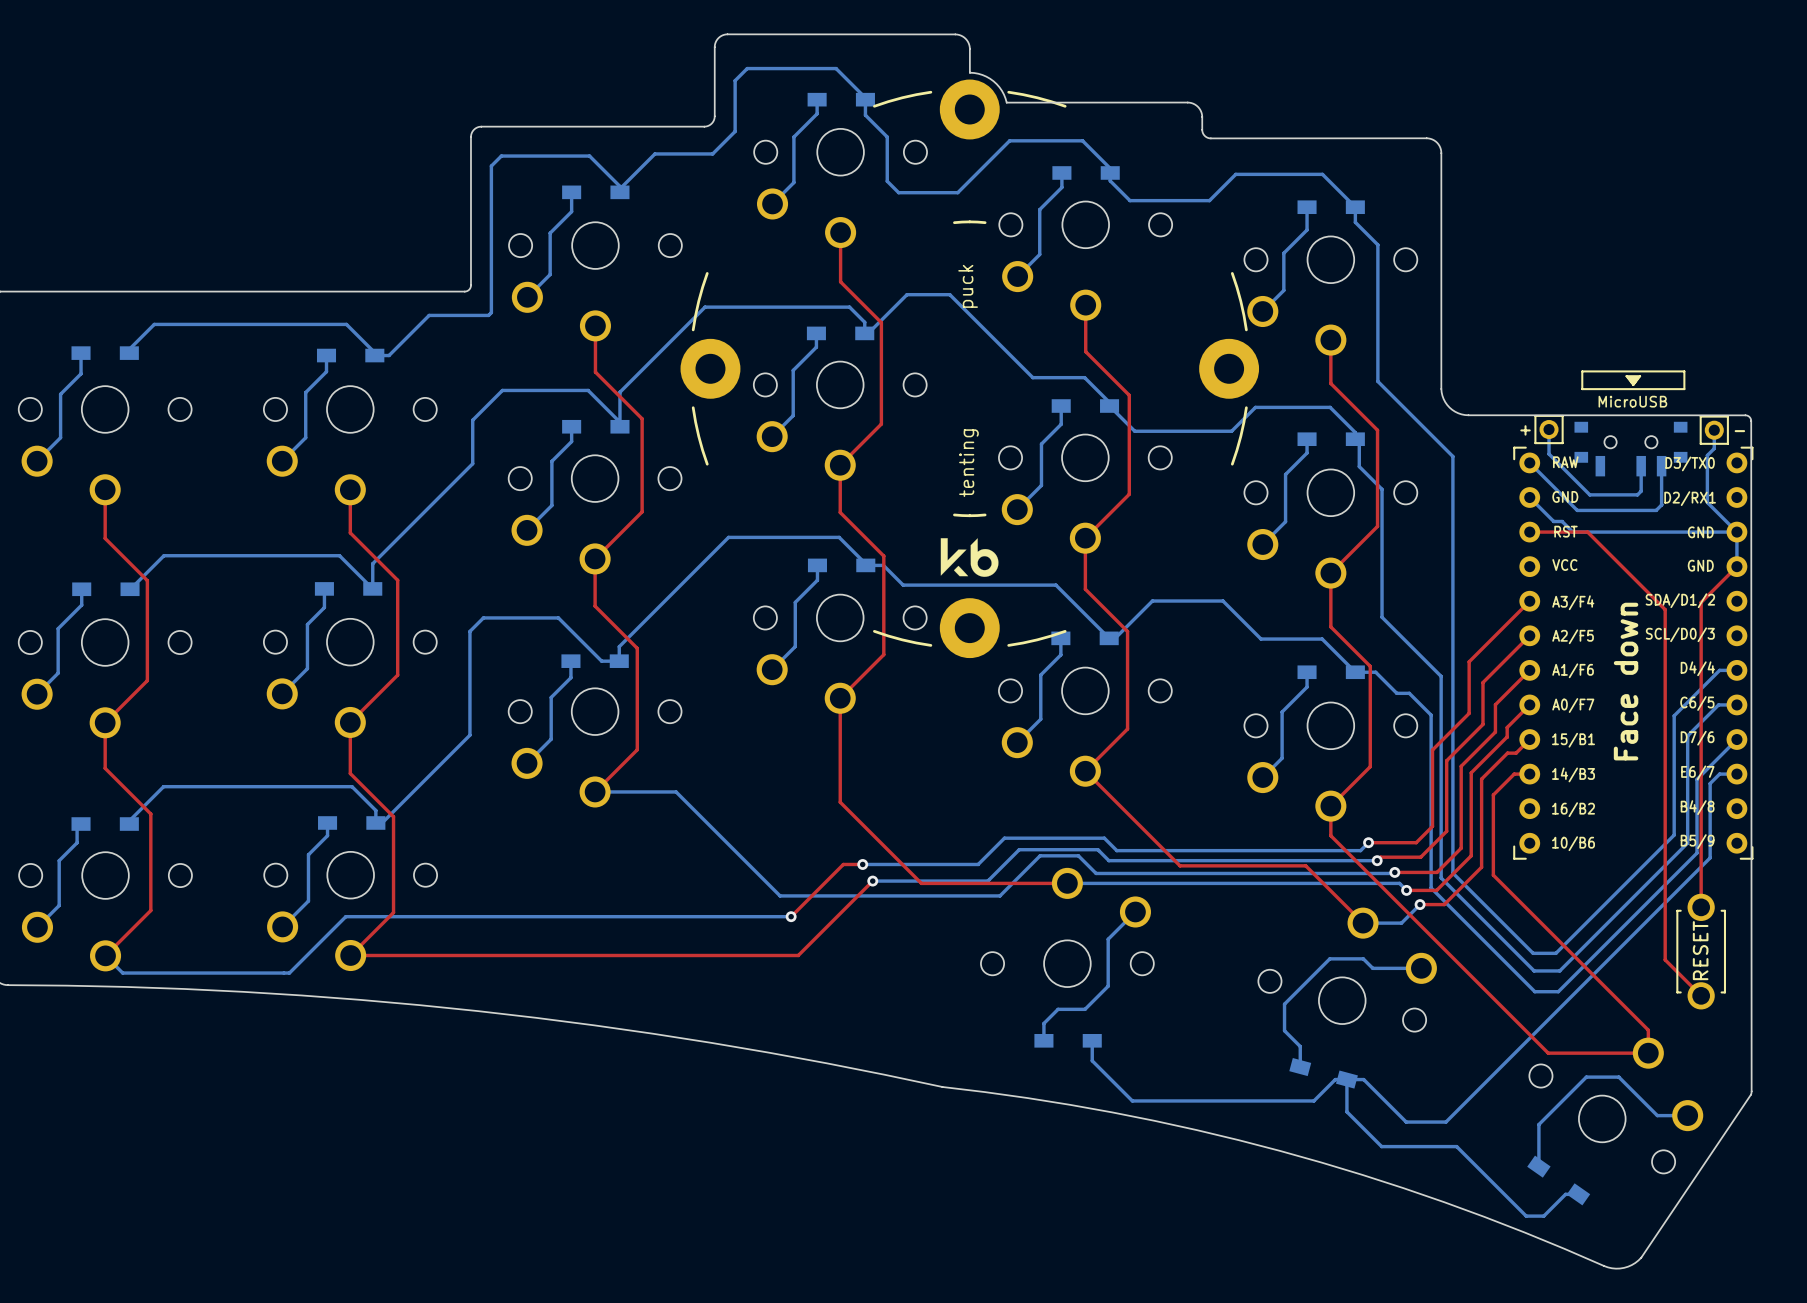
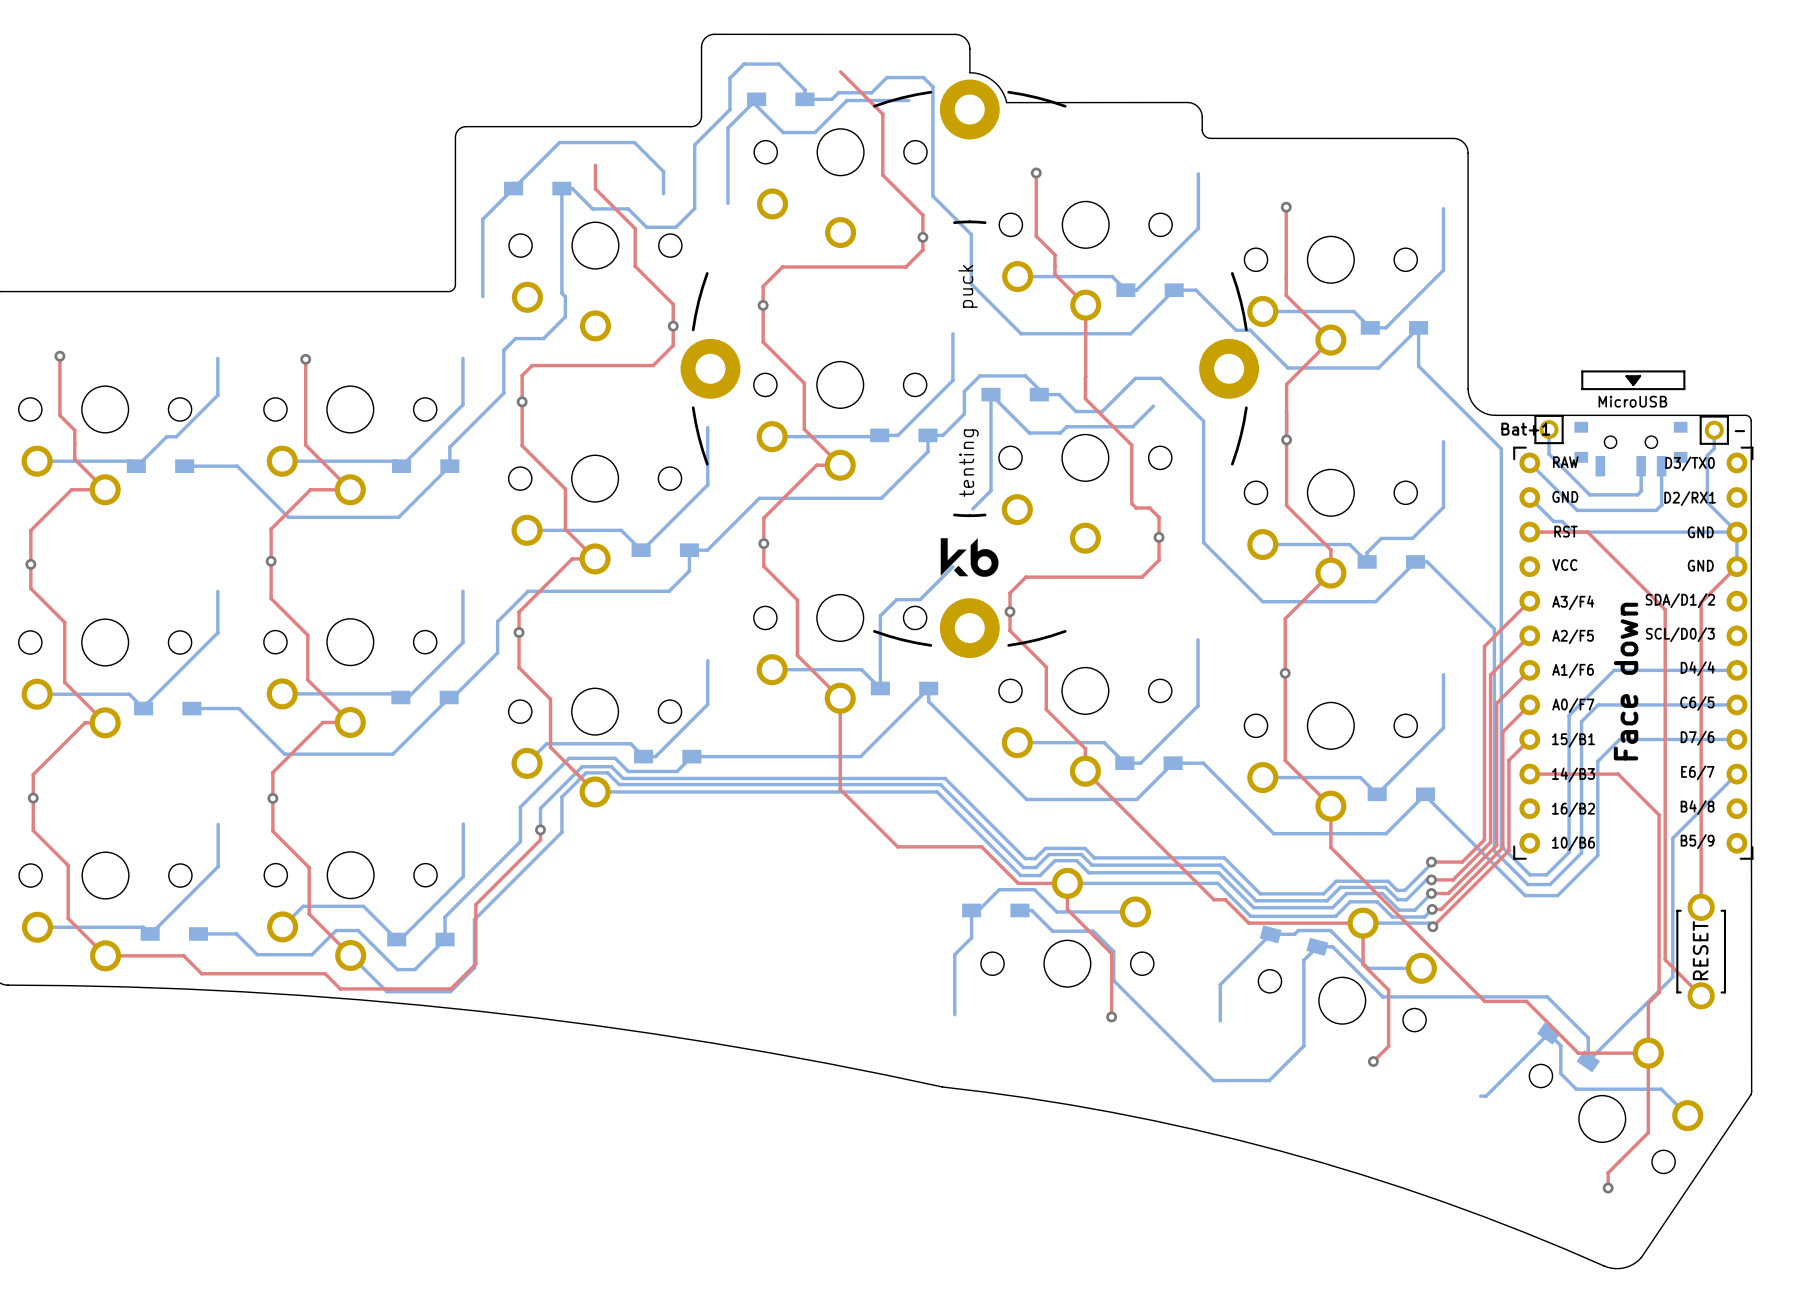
board edge: (727, 34) (719, 37) (714, 45) (713, 120) (707, 126) (691, 126) -> (727, 34) (711, 34) (702, 42) (701, 117) (697, 124) (691, 126)
bottom track: (817, 99) (817, 113) (793, 137) (793, 182) (772, 203) -> none
part position: (841, 99) -> (780, 99)
bottom track: none -> (908, 100) (847, 100) (815, 132) (783, 132) (756, 105) (756, 99) (727, 128) (727, 203)
board edge: (481, 126) (474, 129) (470, 137) (470, 286) (466, 291) (449, 291) -> (481, 126) (463, 127) (457, 130) (455, 136) (455, 285) (453, 289) (449, 291)
board edge: (1210, 138) (1426, 138) (1437, 142) (1441, 153) (1441, 388) (1445, 402) (1455, 411) (1468, 415) (1745, 415) -> (1210, 138) (1453, 138) (1463, 142) (1468, 153) (1468, 389) (1472, 402) (1482, 411) (1495, 415) (1745, 415)
top track: none -> (1036, 172) (1036, 236) (1054, 254) (1054, 274) (1085, 305)
via: none -> (1036, 172)
bottom track: (1061, 172) (1061, 187) (1039, 209) (1039, 254) (1017, 276) -> (1198, 173) (1198, 228) (1136, 290) (1125, 290) (1112, 276) (1017, 276)
part: (1086, 172) -> none
bottom track: (619, 188) (654, 153) (712, 153) (735, 131) (735, 80) (747, 68) (836, 68) (865, 97) (865, 115) (887, 137) (887, 181) (898, 192) (957, 192) (1009, 140) (1082, 140) (1110, 168) (1110, 180) (1129, 200) (1209, 200) (1235, 174) (1322, 174) (1355, 207) (1355, 222) (1377, 244) (1377, 381) (1452, 456) (1452, 873) (1533, 953) (1555, 953) (1674, 835) (1674, 715) (1719, 670) -> (184, 466) (237, 466) (288, 517) (398, 517) (449, 466) (449, 447) (503, 393) (503, 350) (515, 338) (543, 338) (565, 316) (565, 296) (561, 293) (561, 188) (572, 188) (592, 208) (628, 208) (646, 227) (676, 227) (694, 208) (694, 144) (729, 109) (729, 78) (744, 64) (779, 64) (804, 89) (804, 99) (831, 99) (838, 92) (871, 92) (886, 77) (923, 77) (932, 86) (932, 196) (971, 234) (971, 283) (1021, 333) (1130, 333) (1174, 290) (1196, 290) (1236, 330) (1250, 330) (1287, 367) (1378, 367) (1418, 327) (1418, 366) (1501, 448) (1501, 846) (1530, 874) (1546, 874) (1569, 852) (1569, 715) (1614, 670) (1719, 670)
bottom track: (571, 192) (571, 211) (550, 233) (550, 274) (527, 297) -> none
part position: (595, 192) -> (537, 188)
bottom track: (619, 192) (619, 186) (589, 156) (501, 156) (491, 166) (491, 312) (488, 315) (429, 315) (389, 355) (374, 355) (374, 352) (346, 324) (154, 324) (129, 349) (129, 353) -> none
bottom track: none -> (663, 193) (663, 171) (634, 142) (559, 142) (482, 219) (482, 296)
via: none -> (1286, 207)
bottom track: (1307, 207) (1307, 229) (1283, 253) (1283, 290) (1262, 311) -> (1443, 208) (1443, 270) (1385, 327) (1370, 327) (1353, 311) (1262, 311)
part: (1331, 207) -> none
top track: (840, 232) (840, 281) (881, 322) (881, 424) (840, 465) (840, 512) (883, 556) (883, 654) (840, 698) -> (840, 71) (882, 114) (882, 175) (922, 215) (922, 250) (905, 267) (782, 267) (763, 286) (763, 342) (804, 383) (804, 429) (840, 465) (816, 465) (763, 518) (763, 566) (797, 599) (797, 655) (840, 698)
via: none -> (922, 237)
part: none -> (1149, 290)
via: none -> (763, 305)
top track: (595, 325) (595, 372) (642, 418) (642, 511) (595, 558) (595, 606) (637, 648) (637, 749) (595, 791) -> (595, 165) (595, 188) (635, 228) (635, 266) (673, 304) (673, 345) (653, 365) (532, 365) (522, 375) (522, 445) (565, 488) (565, 529) (595, 558) (572, 558) (519, 612) (519, 667) (550, 699) (550, 747) (595, 791)
via: none -> (673, 326)
part: none -> (1394, 327)
bottom track: (816, 333) (816, 347) (793, 370) (793, 415) (772, 436) -> (952, 333) (952, 380) (897, 435) (772, 436)
part: (840, 333) -> none
top track: (1330, 340) (1330, 383) (1377, 430) (1377, 526) (1330, 573) (1330, 626) (1370, 666) (1370, 766) (1330, 806) -> (1286, 207) (1286, 295) (1330, 340) (1286, 384) (1286, 505) (1330, 549) (1330, 573) (1285, 618) (1285, 760) (1330, 806)
top track: (1085, 351) (1129, 395) (1129, 494) (1085, 538) (1085, 589) (1127, 631) (1127, 729) (1085, 771) -> (1085, 351) (1085, 398) (1131, 445) (1131, 503) (1136, 508) (1149, 508) (1159, 517) (1159, 560) (1142, 577) (1025, 577) (1010, 593) (1010, 630) (1046, 667) (1046, 709) (1085, 748) (1085, 771)
bottom track: (81, 353) (81, 373) (60, 394) (60, 437) (37, 461) -> (217, 358) (217, 395) (176, 436) (166, 436) (137, 466) (131, 461) (37, 461)
part: (105, 353) -> none
bottom track: (326, 355) (326, 371) (305, 392) (305, 437) (282, 461) -> (462, 358) (462, 404) (401, 466) (396, 461) (282, 461)
part: (350, 355) -> none
top track: none -> (59, 356) (59, 415) (74, 430) (74, 459) (105, 489) (71, 489) (30, 530) (30, 588) (64, 622) (64, 682) (105, 722) (85, 722) (33, 774) (33, 830) (68, 865) (68, 918) (105, 955) (183, 955) (201, 973) (325, 973) (340, 988) (450, 988) (475, 964) (475, 904) (540, 839) (540, 829)
via: none -> (59, 356)
top track: none -> (305, 359) (305, 445) (350, 489) (310, 489) (271, 529) (271, 598) (307, 635) (307, 679) (350, 722) (322, 722) (272, 772) (272, 831) (309, 867) (309, 914) (350, 955)
via: none -> (305, 359)
part: none -> (1015, 394)
via: none -> (522, 401)
bottom track: (1061, 406) (1061, 424) (1041, 444) (1041, 485) (1017, 509) -> none
part: (1085, 406) -> none
bottom track: none -> (1153, 406) (1132, 426) (1066, 426) (1060, 432) (1029, 432) (990, 394) (990, 490) (972, 508)
bottom track: (619, 422) (588, 390) (502, 390) (472, 420) (472, 463) (372, 563) (372, 588) (339, 555) (163, 555) (130, 589) -> none
bottom track: (571, 426) (571, 441) (551, 461) (551, 505) (527, 530) -> (707, 427) (707, 484) (642, 550) (621, 530) (527, 530)
part: (595, 426) -> none
bottom track: (619, 426) (619, 392) (705, 307) (849, 307) (864, 322) (864, 333) (868, 333) (906, 294) (949, 294) (1032, 377) (1084, 377) (1134, 431) (1231, 431) (1255, 407) (1330, 407) (1355, 432) (1355, 439) (1359, 443) (1359, 466) (1382, 489) (1382, 617) (1441, 676) (1441, 877) (1534, 970) (1559, 970) (1687, 843) (1687, 735) (1718, 704) -> (191, 708) (238, 708) (284, 754) (392, 754) (449, 697) (453, 697) (497, 652) (497, 621) (528, 591) (669, 591) (689, 571) (689, 550) (707, 550) (759, 498) (881, 498) (927, 451) (927, 435) (942, 435) (964, 413) (964, 391) (979, 375) (1025, 375) (1039, 389) (1039, 394) (1059, 394) (1076, 411) (1102, 411) (1135, 378) (1160, 378) (1203, 421) (1203, 542) (1262, 601) (1375, 601) (1415, 561) (1427, 561) (1494, 629) (1494, 850) (1527, 884) (1550, 884) (1581, 853) (1581, 721) (1598, 704) (1718, 704)
Bat+1 name: + (1525, 430) -> Bat+1 (1525, 429)
part: none -> (903, 435)
via: none -> (1286, 439)
bottom track: (1307, 439) (1307, 452) (1285, 474) (1285, 521) (1262, 544) -> (1443, 441) (1443, 507) (1412, 538) (1381, 538) (1367, 552) (1367, 561) (1349, 544) (1262, 544)
part: (1331, 439) -> none
part: none -> (160, 466)
part: none -> (425, 466)
top track: (105, 489) (105, 538) (147, 580) (147, 680) (105, 722) (105, 768) (150, 813) (150, 910) (105, 955) -> none
top track: (350, 489) (350, 532) (397, 580) (397, 675) (350, 722) (350, 773) (393, 816) (393, 912) (350, 955) (798, 955) (872, 881) -> none
via: none -> (1159, 537)
via: none -> (763, 543)
part: none -> (665, 550)
via: none -> (271, 561)
part: none -> (1391, 561)
via: none -> (30, 564)
bottom track: (817, 565) (817, 580) (795, 602) (795, 646) (772, 669) -> (952, 566) (920, 599) (896, 599) (880, 615) (880, 688) (861, 669) (772, 669)
part: (841, 565) -> none
bottom track: (324, 588) (324, 607) (307, 624) (307, 668) (282, 693) -> (462, 591) (462, 642) (408, 697) (400, 697) (397, 693) (282, 693)
part: (348, 588) -> none
bottom track: (81, 589) (81, 605) (58, 628) (58, 673) (37, 694) -> (217, 591) (217, 632) (143, 708) (129, 694) (37, 694)
part: (105, 589) -> none
via: none -> (1010, 611)
via: none -> (519, 632)
bottom track: (1060, 638) (1060, 654) (1040, 675) (1040, 719) (1017, 742) -> (1198, 639) (1198, 705) (1140, 763) (1124, 763) (1104, 742) (1017, 742)
part: (1085, 638) -> none
top track: (1484, 646) (1469, 661) (1469, 713) (1432, 750) (1432, 826) (1416, 842) (1368, 842) -> (1484, 646) (1484, 839) (1462, 862) (1431, 862)
bottom track: (570, 661) (570, 677) (551, 697) (551, 739) (546, 743) -> (707, 660) (707, 704) (655, 756) (643, 756) (630, 743) (546, 743)
part: (595, 661) -> none
bottom track: (1307, 672) (1307, 687) (1282, 712) (1282, 758) (1262, 777) -> (1443, 674) (1443, 727) (1377, 794) (1360, 777) (1262, 777)
part: (1331, 672) -> none
via: none -> (1285, 673)
top track: (1490, 674) (1482, 682) (1482, 724) (1446, 760) (1446, 831) (1420, 857) (1380, 857) (1377, 860) -> (1490, 674) (1490, 842) (1453, 879) (1431, 879)
part: none -> (904, 688)
part: none -> (425, 697)
top track: (1496, 703) (1495, 732) (1461, 766) (1461, 848) (1437, 872) (1394, 872) -> (1496, 703) (1496, 845) (1448, 893) (1431, 893)
part: none -> (167, 708)
top track: (1507, 727) (1507, 737) (1471, 772) (1471, 855) (1436, 890) (1406, 890) -> (1507, 727) (1502, 731) (1502, 847) (1441, 909) (1432, 909)
bottom track: (1736, 739) (1697, 779) (1697, 853) (1558, 991) (1534, 991) (1431, 887) (1431, 715) (1409, 693) (1396, 693) (1375, 672) (1355, 672) (1322, 639) (1261, 639) (1222, 601) (1152, 601) (1115, 638) (1109, 638) (1055, 585) (903, 585) (883, 565) (865, 565) (839, 537) (728, 537) (619, 646) (619, 661) (601, 661) (558, 617) (483, 617) (469, 631) (469, 735) (382, 822) (375, 822) (375, 810) (352, 786) (163, 786) (129, 820) (129, 824) -> (1736, 739) (1619, 739) (1597, 761) (1597, 855) (1557, 895) (1525, 895) (1425, 794) (1386, 833) (1273, 833) (1203, 763) (1173, 763) (1136, 799) (1026, 799) (928, 701) (928, 688) (860, 756) (691, 756) (677, 771) (628, 771) (615, 758) (569, 758) (520, 807) (520, 841) (445, 917) (445, 939) (414, 969) (397, 969) (358, 930) (336, 930) (311, 954) (257, 954) (236, 933) (198, 933)
top track: (1516, 753) (1507, 753) (1481, 779) (1481, 867) (1444, 904) (1420, 904) -> (1516, 753) (1508, 760) (1508, 850) (1432, 926)
part: none -> (667, 756)
part: none -> (1148, 763)
top track: (1529, 774) (1514, 774) (1493, 794) (1493, 875) (1648, 1030) -> (1529, 774) (1618, 774) (1659, 815) (1659, 992) (1648, 1003) (1648, 1030)
bottom track: (1736, 774) (1719, 774) (1710, 783) (1710, 857) (1445, 1122) (1406, 1122) (1363, 1079) (1335, 1079) (1313, 1100) (1132, 1100) (1092, 1060) (1092, 1040) -> (1736, 774) (1672, 838) (1672, 977) (1588, 1061) (1588, 1037) (1547, 996) (1382, 996) (1332, 946) (1317, 946) (1303, 960) (1303, 1045) (1269, 1080) (1213, 1080) (1113, 980) (1113, 951) (1093, 931) (1052, 931) (1031, 910) (1019, 910)
top track: (840, 789) (840, 802) (921, 883) (1018, 883) -> (840, 789) (897, 846) (981, 846) (1018, 883)
bottom track: (676, 791) (780, 895) (999, 895) (1040, 855) (1078, 855) (1096, 873) (1394, 872) -> (676, 791) (937, 791) (1020, 875) (1040, 875) (1054, 860) (1076, 860) (1088, 872) (1218, 872) (1253, 907) (1332, 907) (1346, 893) (1382, 893) (1398, 910) (1414, 910) (1431, 893)
part: none -> (1401, 794)
via: none -> (33, 798)
via: none -> (272, 798)
bottom track: (327, 822) (327, 835) (308, 854) (308, 901) (303, 906) -> (463, 824) (463, 876) (400, 939) (396, 939) (363, 906) (303, 906)
part: (351, 822) -> none
bottom track: (81, 824) (77, 827) (77, 842) (59, 860) (59, 905) (37, 927) -> (218, 824) (218, 866) (150, 933) (143, 927) (37, 927)
part: (105, 824) -> none
bottom track: none -> (540, 829) (540, 808) (582, 766) (611, 766) (623, 778) (945, 778) (1025, 858) (1035, 858) (1045, 848) (1084, 848) (1094, 857) (1224, 857) (1260, 893) (1323, 893) (1336, 881) (1388, 881) (1397, 890) (1404, 890) (1431, 862)
via: none -> (540, 829)
top track: (1330, 835) (1548, 1053) (1578, 1053) -> (1330, 835) (1330, 847) (1484, 1001) (1526, 1001) (1578, 1053)
bottom track: (1368, 842) (1360, 850) (1116, 850) (1104, 838) (1004, 838) (978, 864) (862, 864) -> none
via: (1368, 842) -> none
bottom track: (1377, 860) (1108, 860) (1097, 849) (1019, 849) (987, 881) (872, 881) -> none
via: (1377, 860) -> none
via: none -> (1431, 862)
top track: (862, 864) (843, 864) (791, 916) -> none
via: (862, 864) -> none
top track: (1180, 865) (1305, 865) (1363, 923) -> (1180, 865) (1213, 899) (1225, 899) (1248, 923) (1363, 923) (1363, 964) (1388, 989) (1388, 1046) (1373, 1061)
via: (1394, 872) -> none
bottom track: none -> (1431, 879) (1426, 879) (1406, 899) (1397, 899) (1385, 887) (1340, 887) (1327, 900) (1256, 900) (1220, 865) (1091, 865) (1081, 854) (1048, 854) (1035, 867) (1023, 867) (940, 784) (619, 784) (607, 772) (586, 772) (561, 797) (561, 832) (474, 919) (474, 967) (450, 991) (386, 991) (350, 955)
via: none -> (1431, 879)
via: (872, 881) -> none
top track: none -> (1067, 883) (1067, 909) (1111, 953) (1111, 1016)
bottom track: (1217, 883) (1399, 883) (1406, 890) -> (1217, 883) (1250, 916) (1335, 916) (1350, 901) (1377, 901) (1392, 917) (1424, 917) (1432, 909)
via: (1406, 890) -> none
via: none -> (1431, 893)
bottom track: (1420, 904) (1401, 923) -> (1432, 926) (1429, 923) (1401, 923)
via: (1420, 904) -> none
via: none -> (1432, 909)
part: none -> (995, 910)
bottom track: (1135, 911) (1108, 939) (1108, 986) (1085, 1009) (1058, 1009) (1043, 1023) (1043, 1040) -> (1135, 911) (1056, 911) (1034, 889) (999, 889) (978, 910) (971, 910) (971, 937) (954, 954) (954, 1014)
bottom track: (791, 916) (345, 916) (289, 973) (122, 973) (105, 955) -> none
via: (791, 916) -> none
via: none -> (1432, 926)
part: none -> (174, 933)
part: none -> (420, 939)
bottom track: (1372, 968) (1363, 958) (1329, 958) (1284, 1004) (1284, 1030) (1300, 1046) (1300, 1067) -> (1372, 968) (1368, 968) (1330, 930) (1298, 930) (1294, 934) (1270, 934) (1220, 984) (1220, 1020)
via: none -> (1111, 1016)
part: (1068, 1040) -> none
top track: none -> (1648, 1053) (1648, 1132) (1608, 1172) (1608, 1188)
via: none -> (1373, 1061)
part position: (1323, 1073) -> (1294, 940)
bottom track: (1346, 1079) (1346, 1111) (1381, 1146) (1456, 1146) (1526, 1216) (1543, 1216) (1565, 1194) (1578, 1194) -> none
bottom track: (1687, 1115) (1657, 1115) (1618, 1077) (1586, 1077) (1538, 1124) (1538, 1166) -> (1687, 1115) (1661, 1089) (1576, 1089) (1560, 1073) (1560, 1045) (1548, 1033) (1486, 1096) (1480, 1096)
part position: (1558, 1180) -> (1568, 1047)
via: none -> (1608, 1188)

